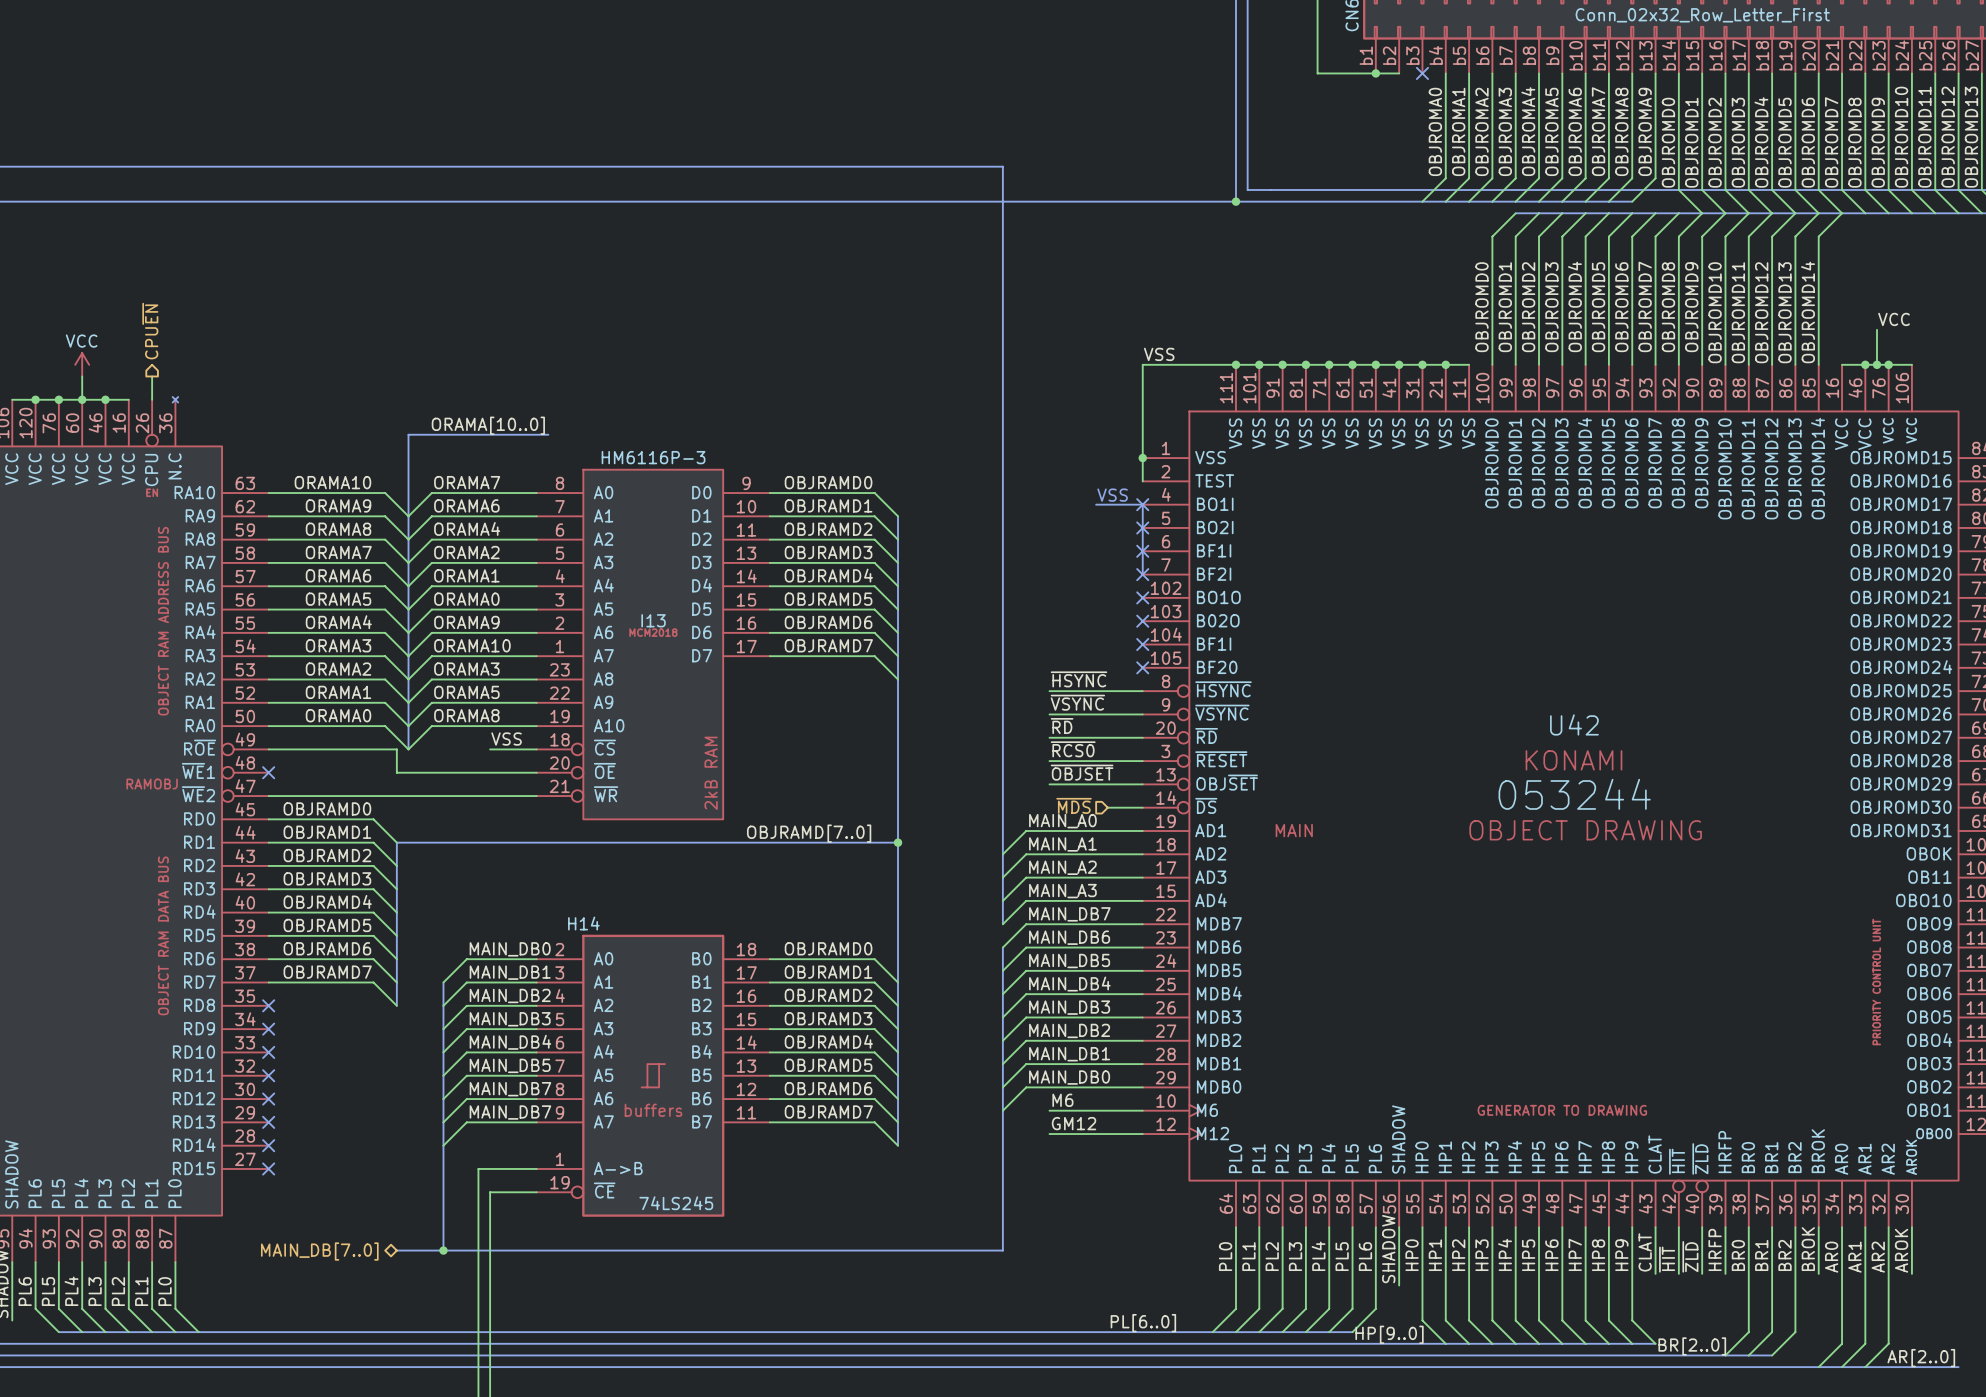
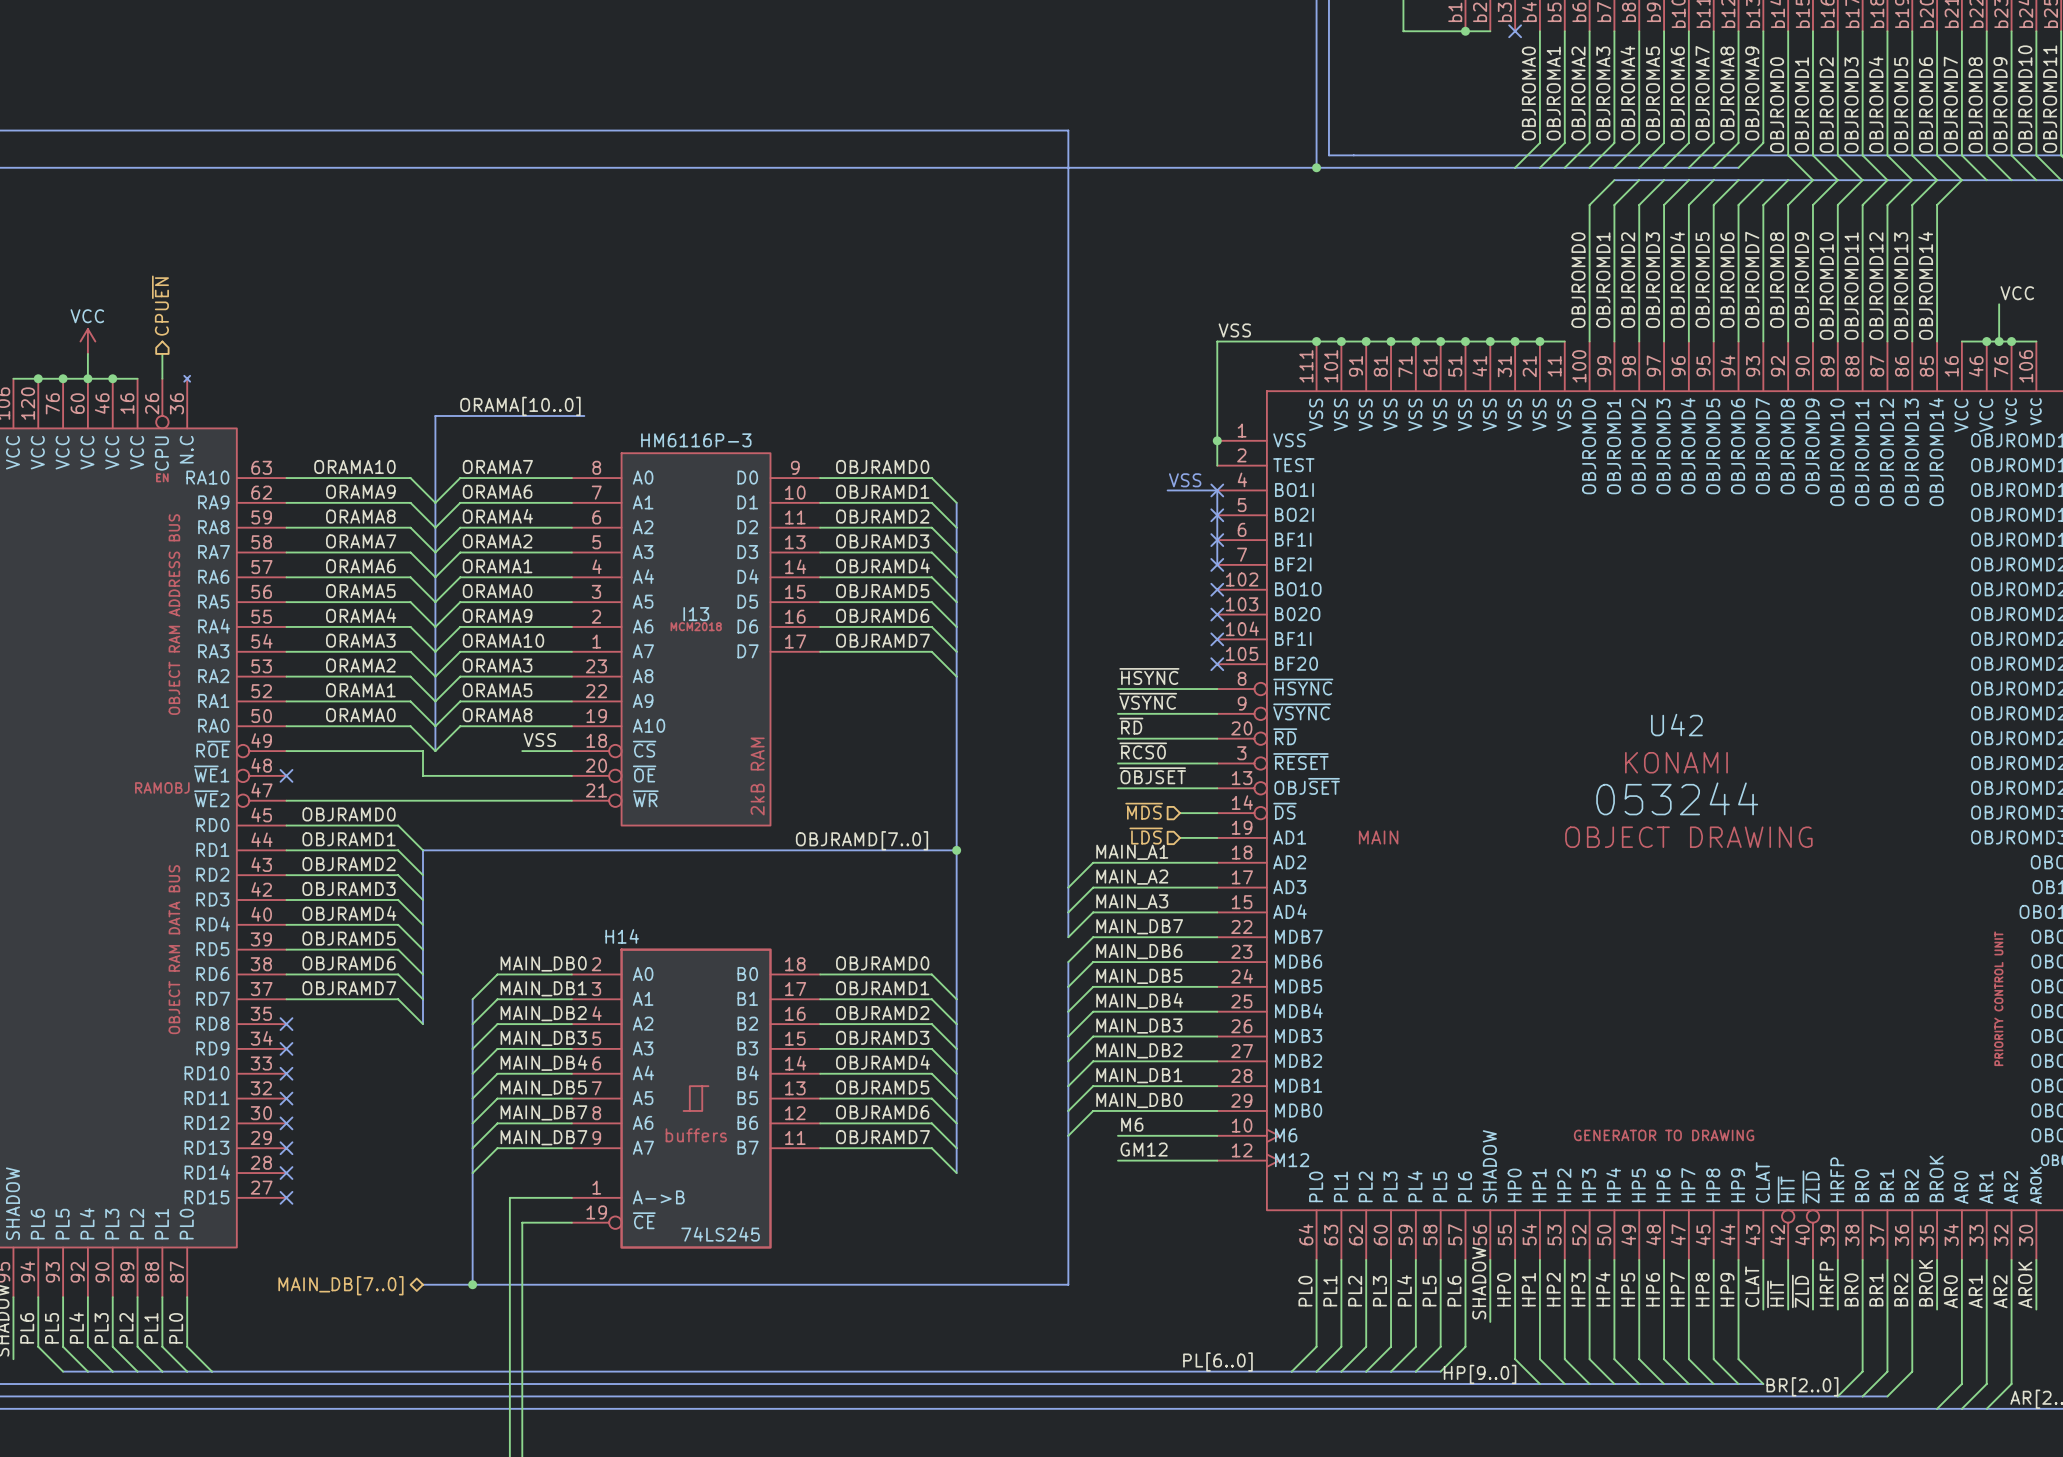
label: MAIN_A0 (1062, 821) -> none
hierarchical label: none -> ~{LDS} (1146, 836)
wire: (1107, 831) (1026, 831) (1002, 854) -> none

